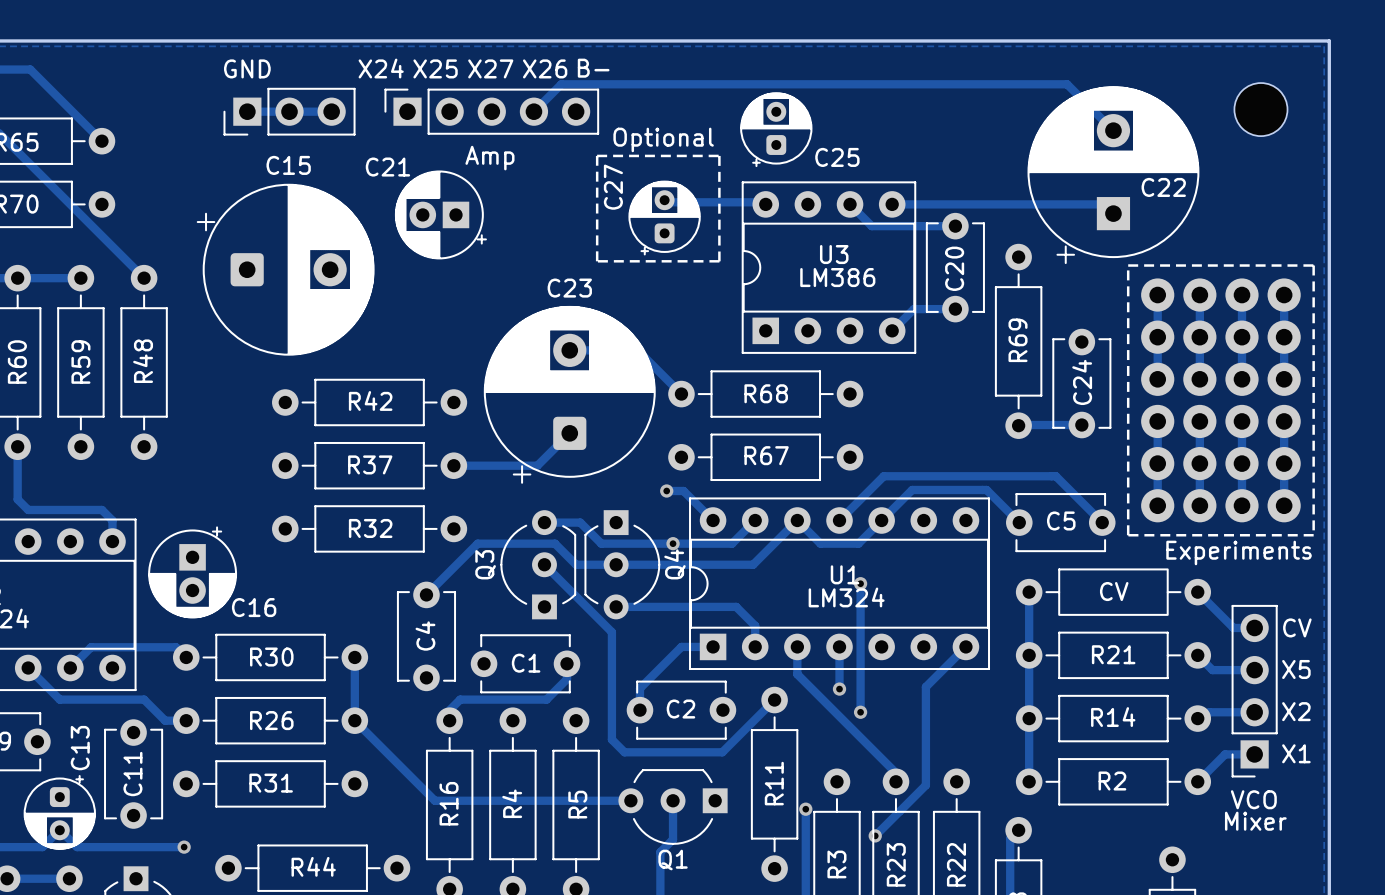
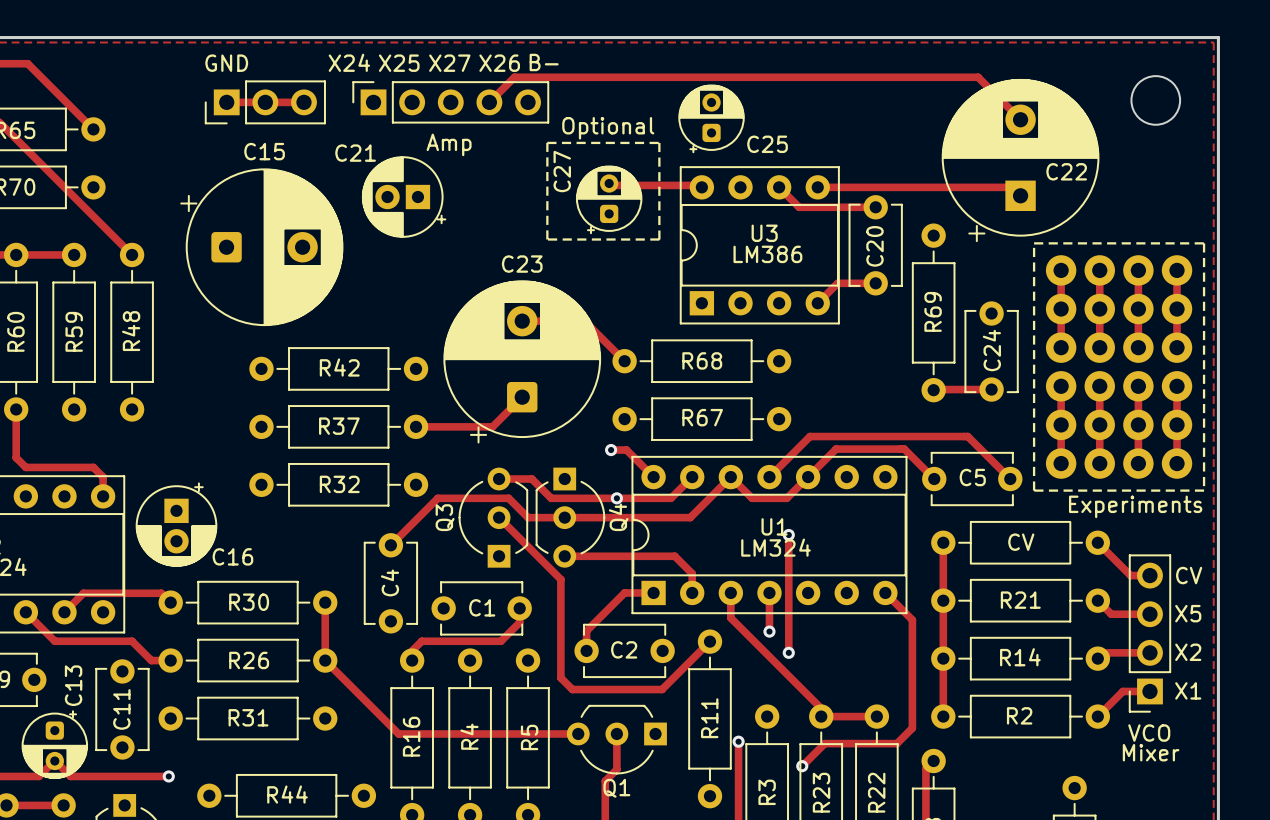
track: (965, 646) (925, 686) (925, 785) (899, 811) -> (885, 592) (912, 620) (912, 728) (896, 743) (824, 743)
track: none -> (821, 716) (876, 716)

